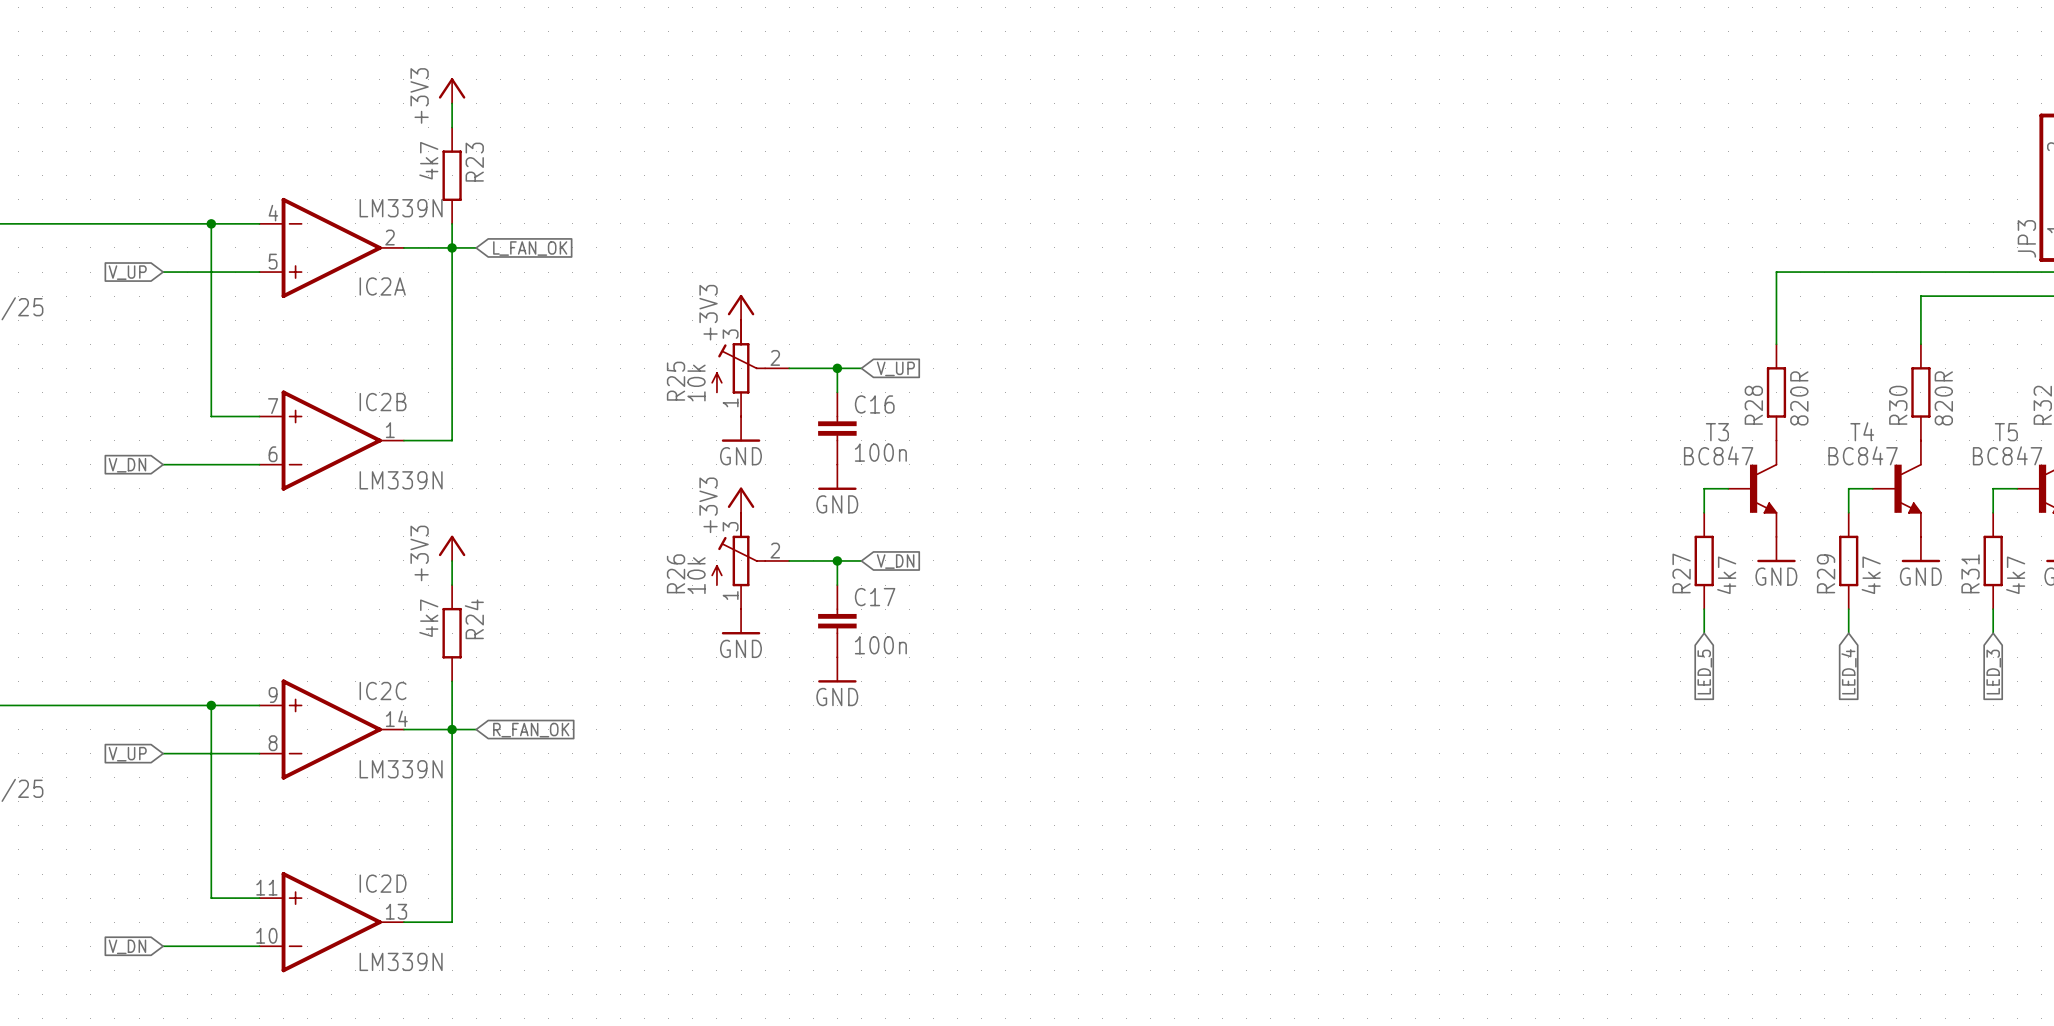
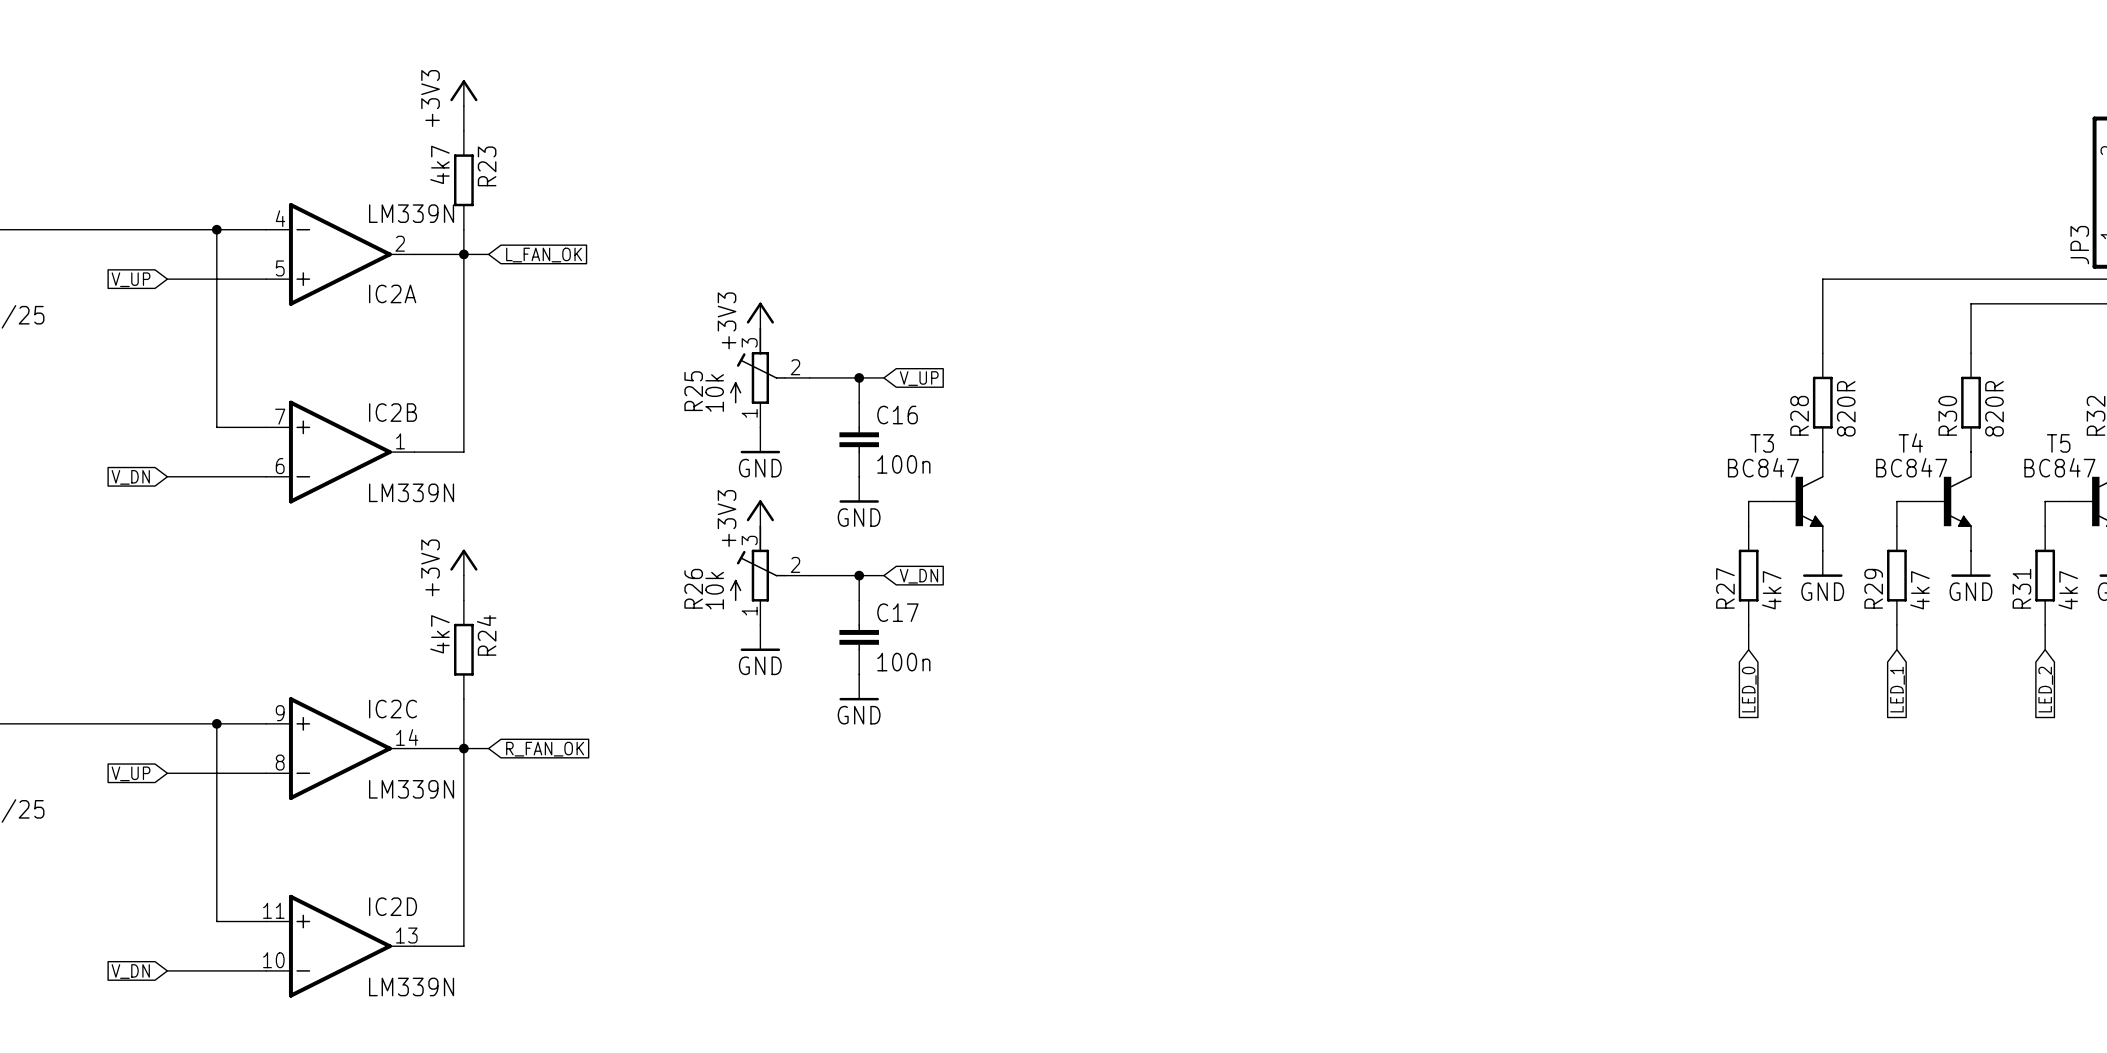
global label: LED_4 (1848, 671) -> LED_1 (1897, 689)
global label: LED_5 (1704, 672) -> LED_0 (1749, 689)
global label: LED_3 (1993, 672) -> LED_2 (2045, 689)

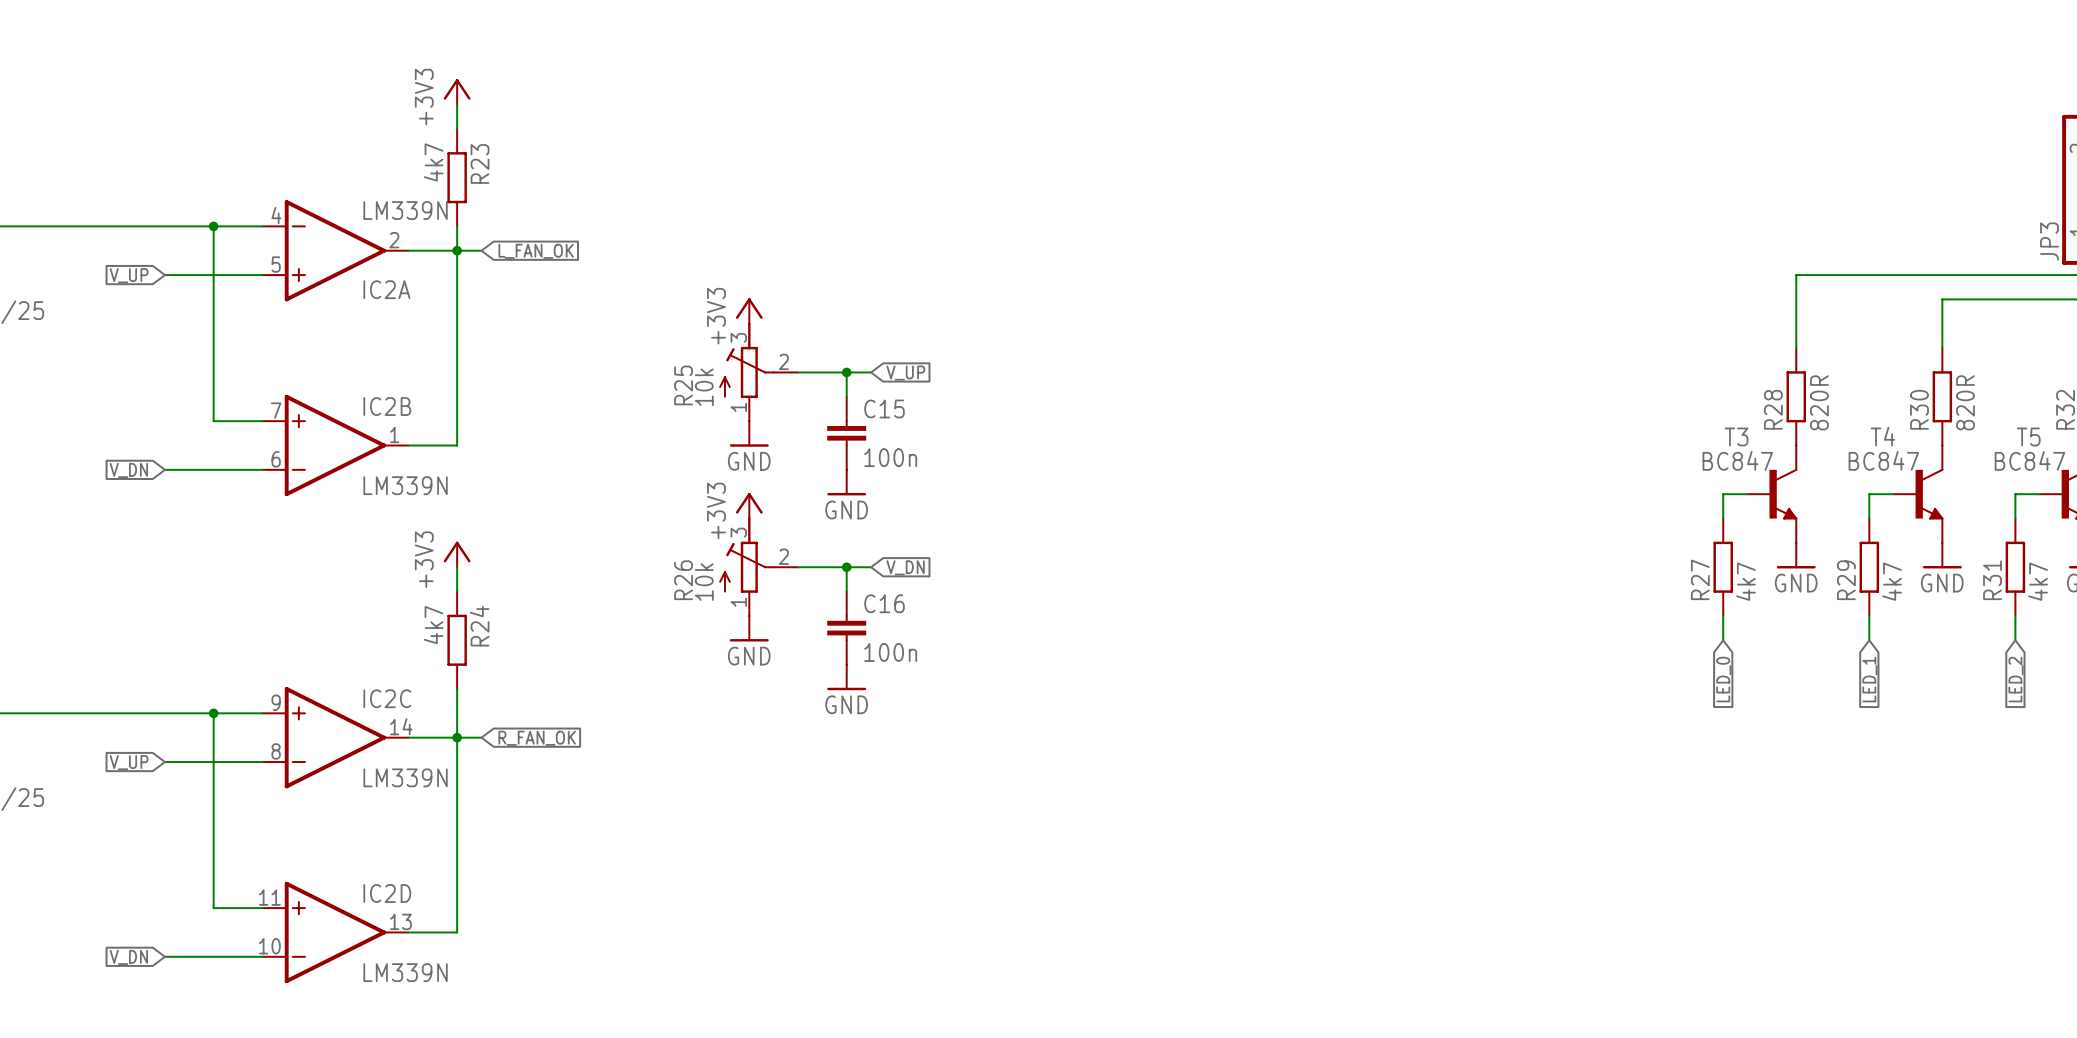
C16 name: C16 (897, 415) -> C15 (884, 408)
C17 name: C17 (897, 612) -> C16 (884, 603)

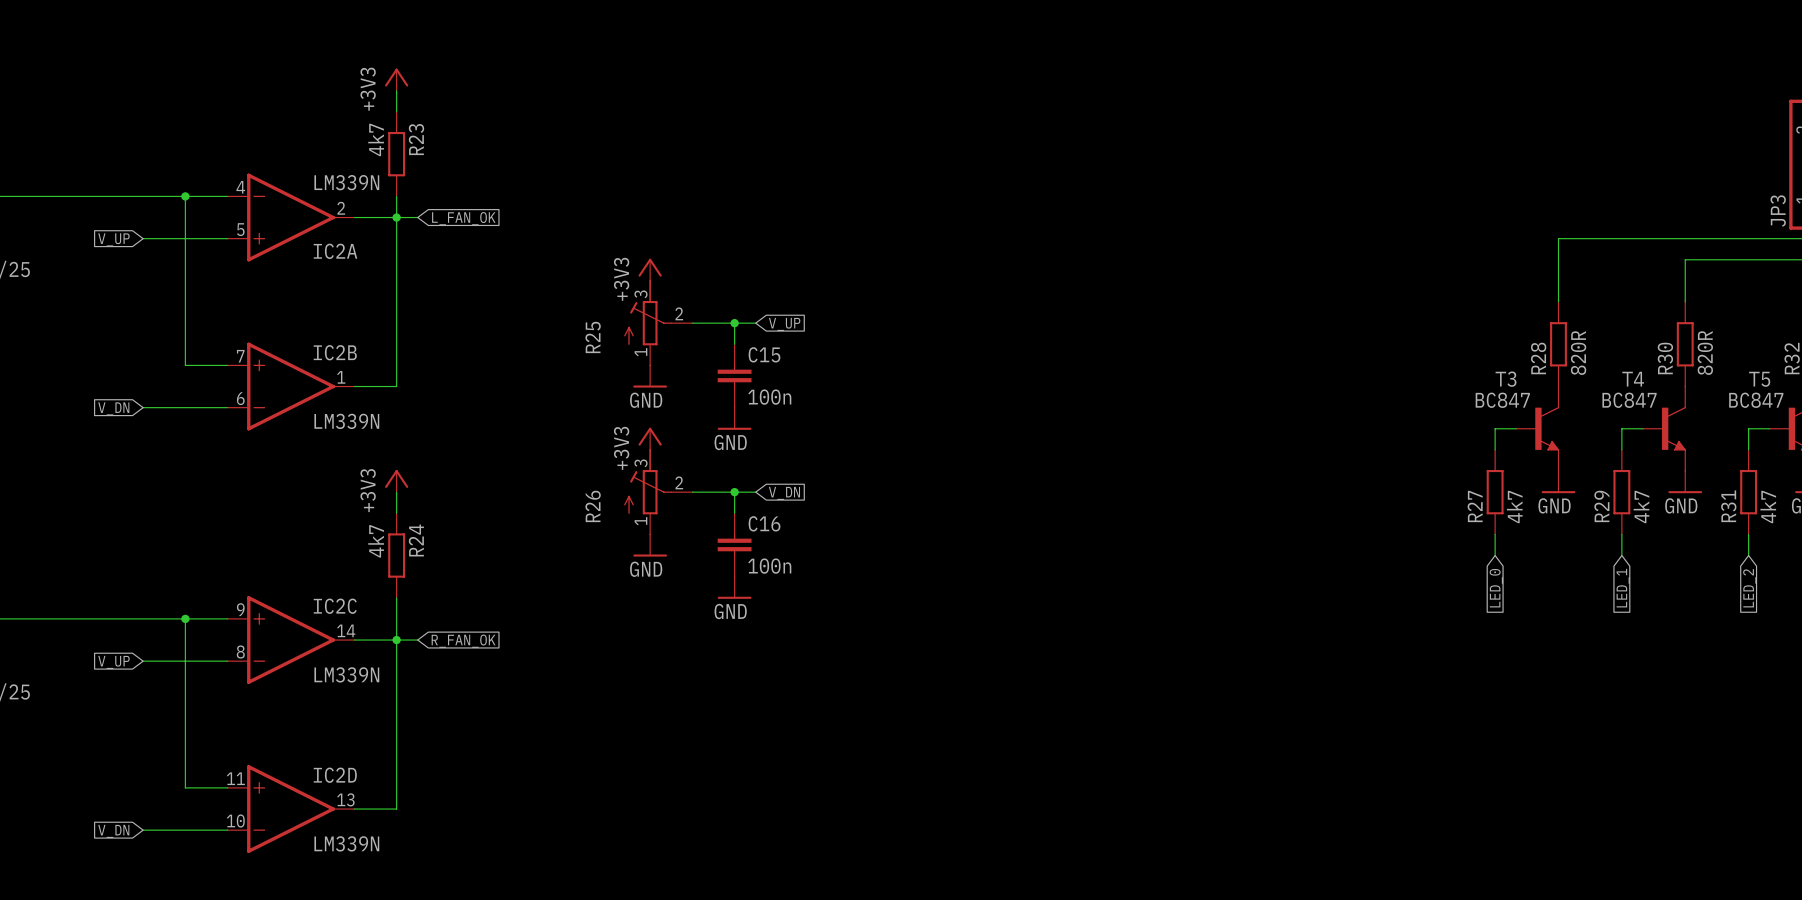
R25 value: 10k (704, 387) -> none
R26 value: 10k (704, 582) -> none

